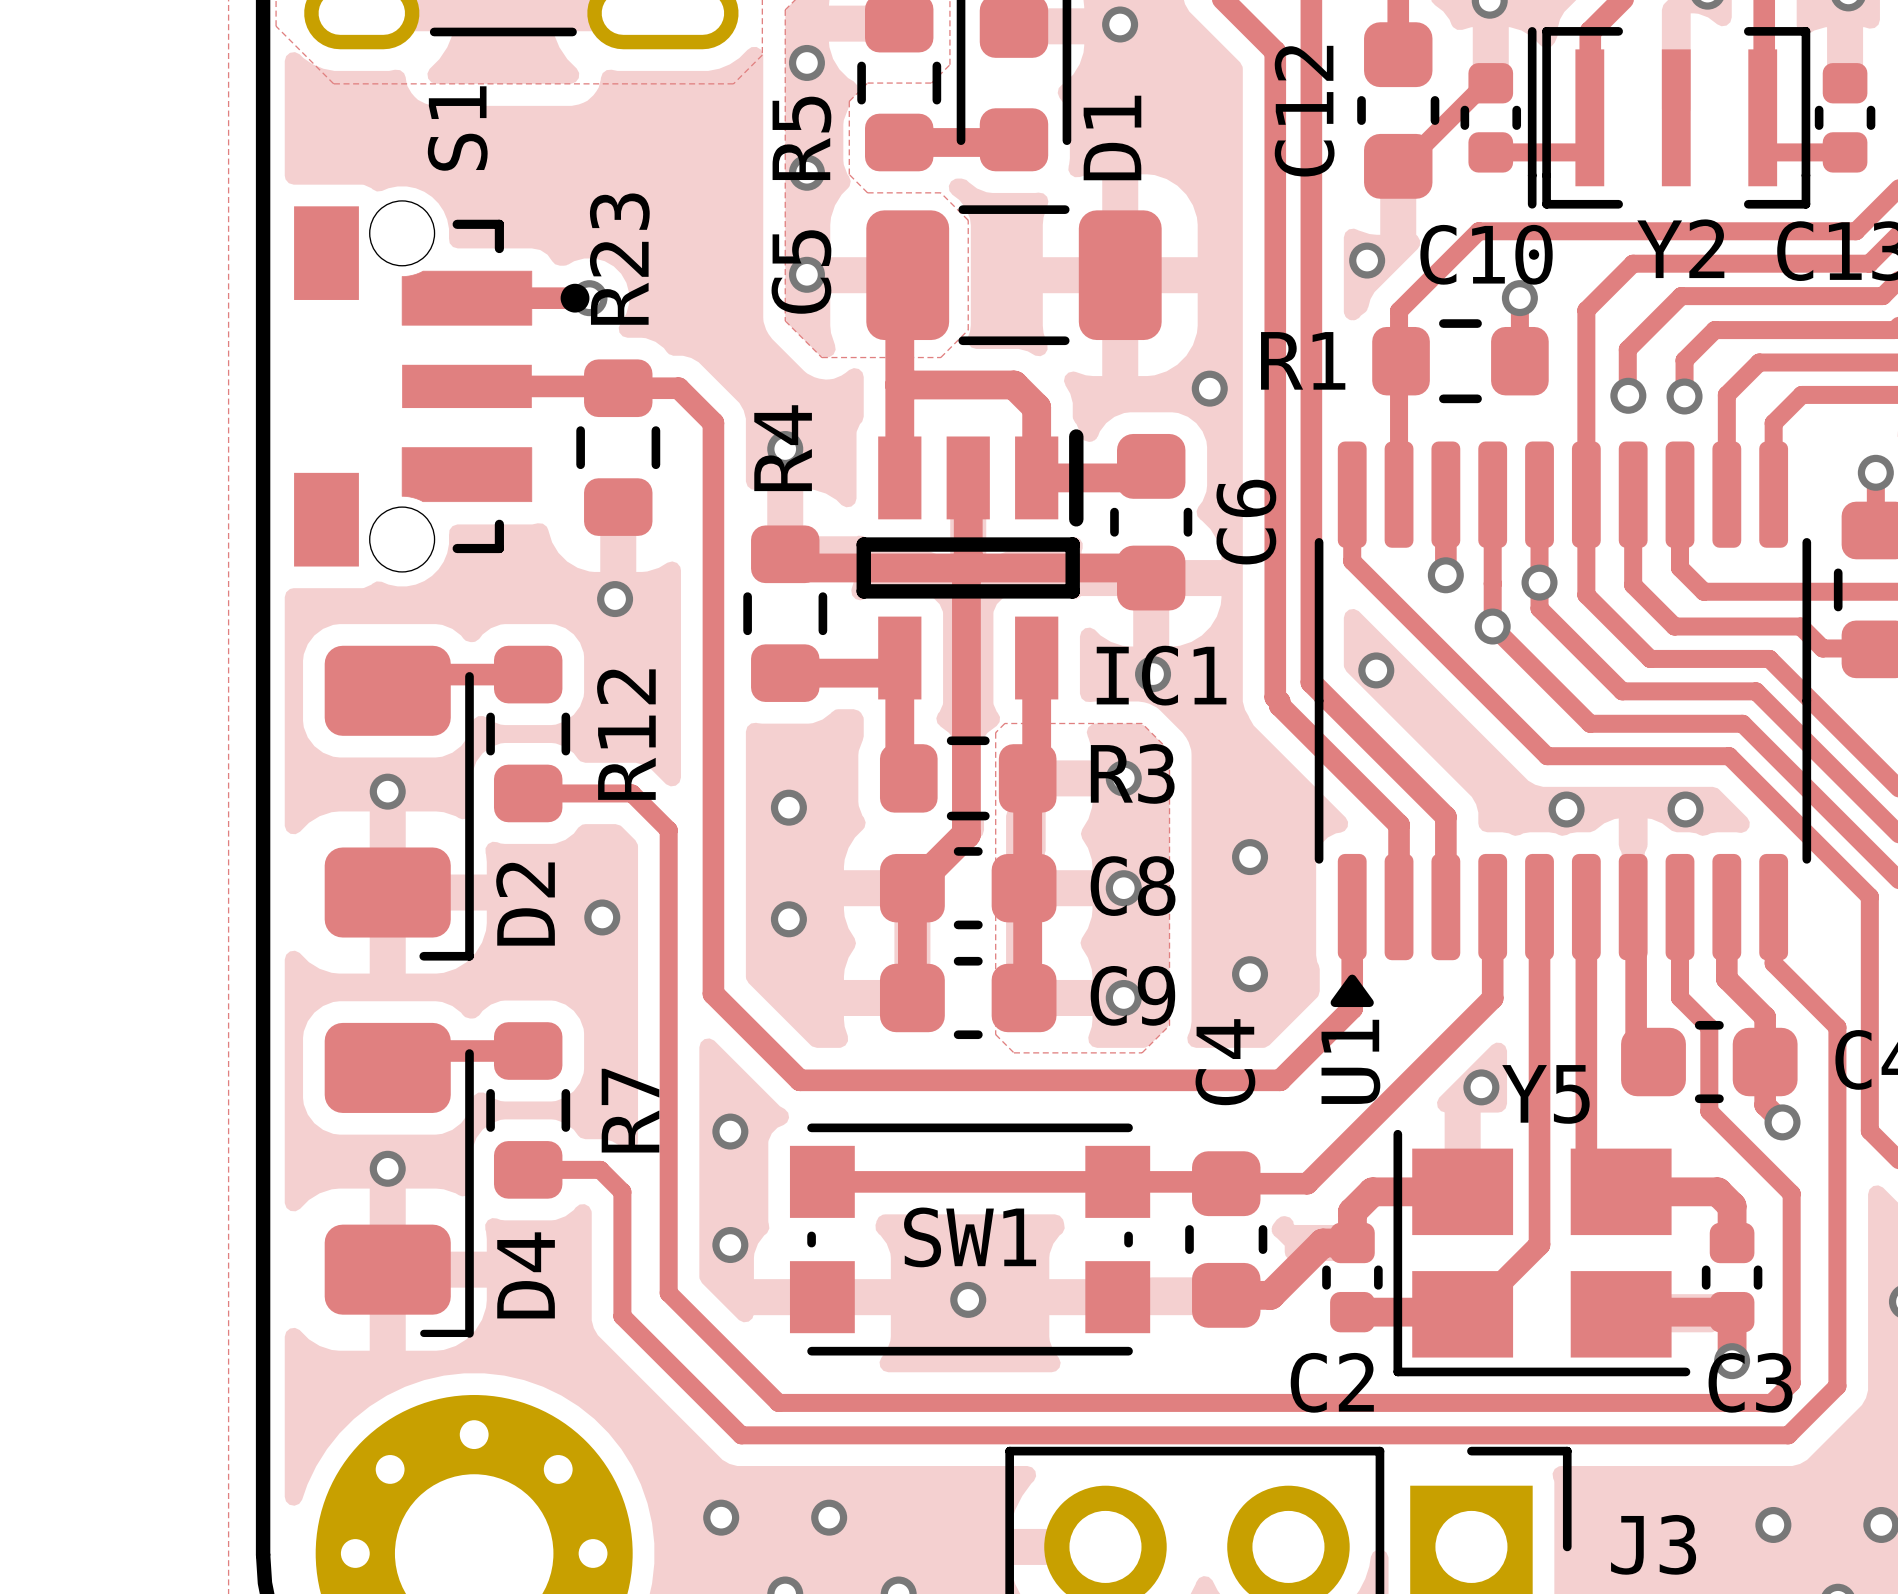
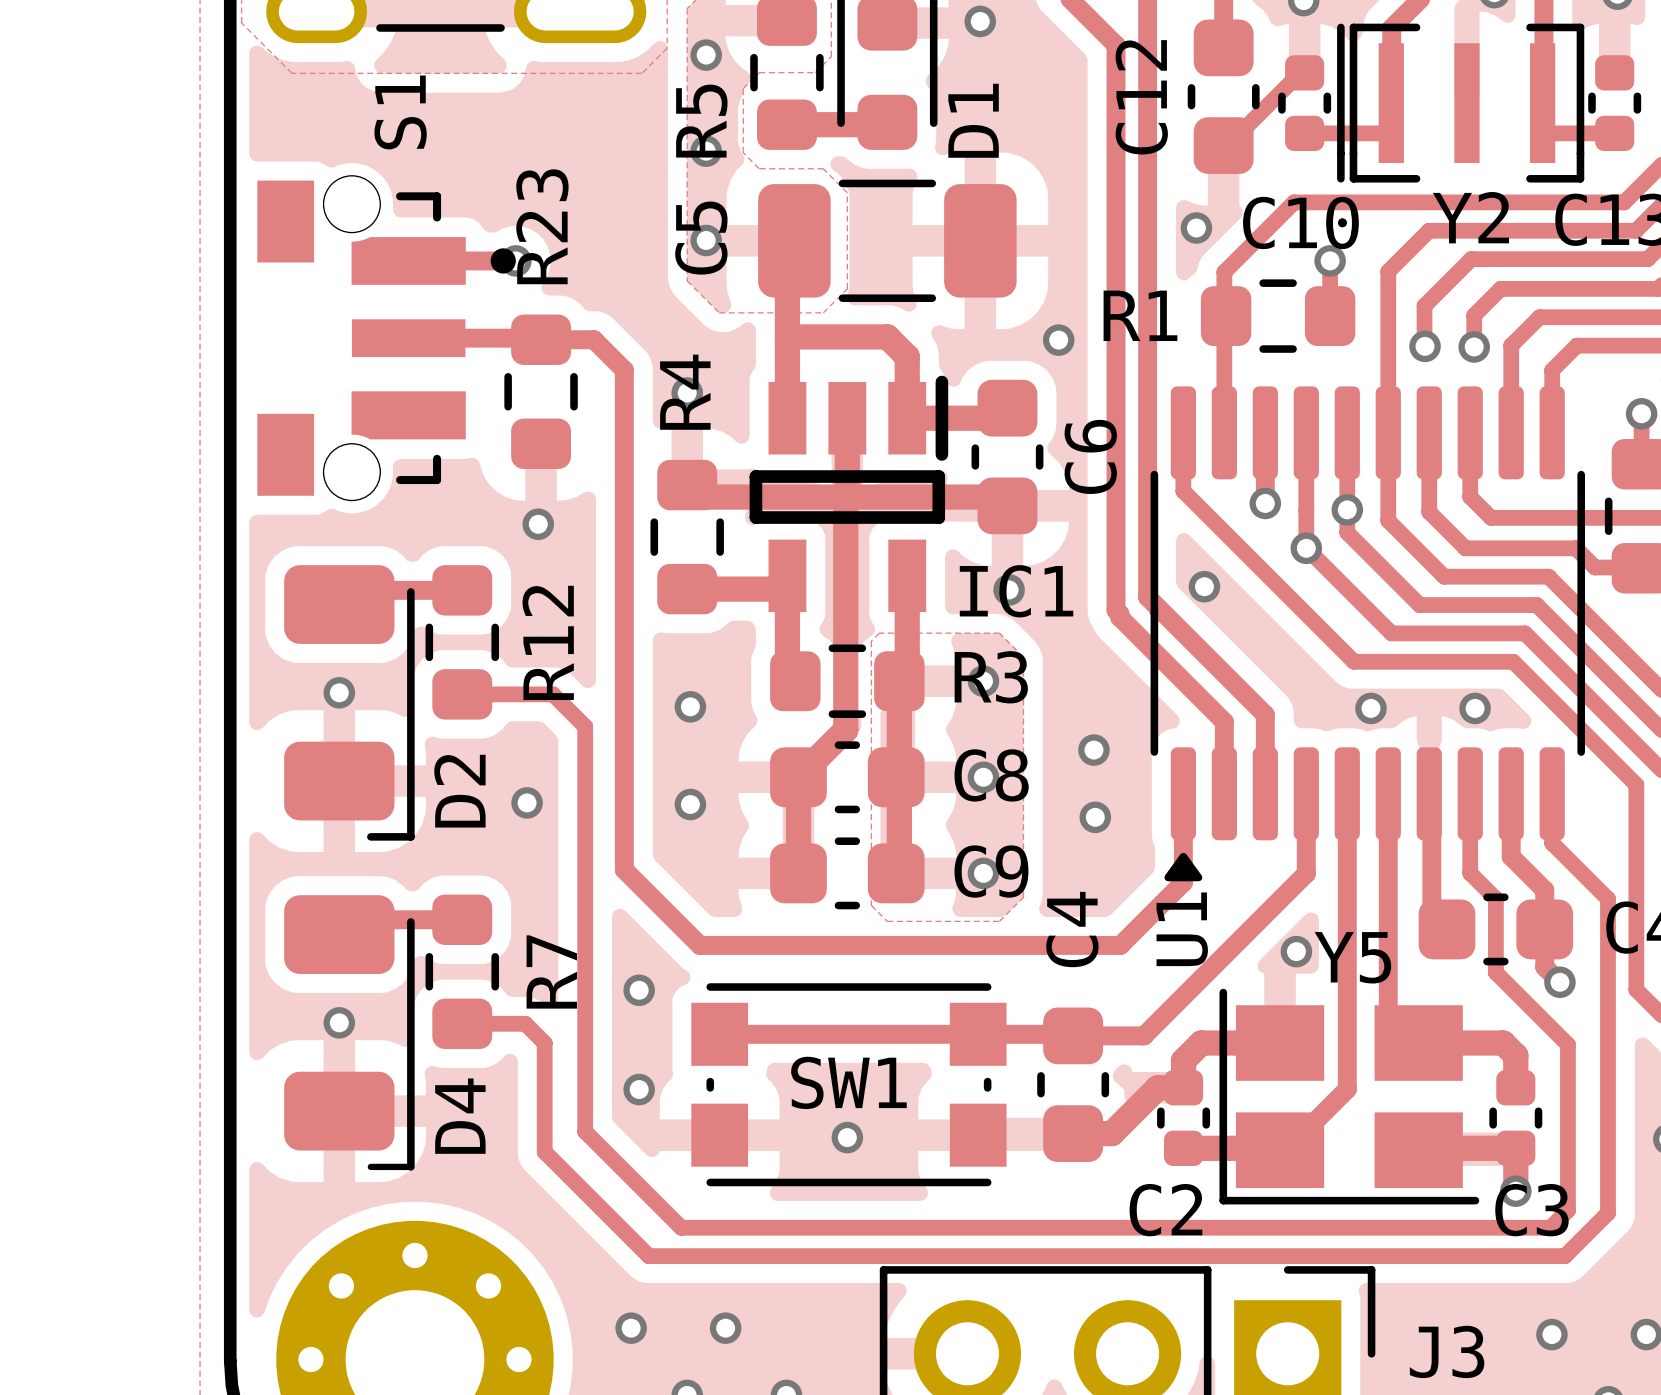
via position: (1250, 974) -> (1095, 817)

